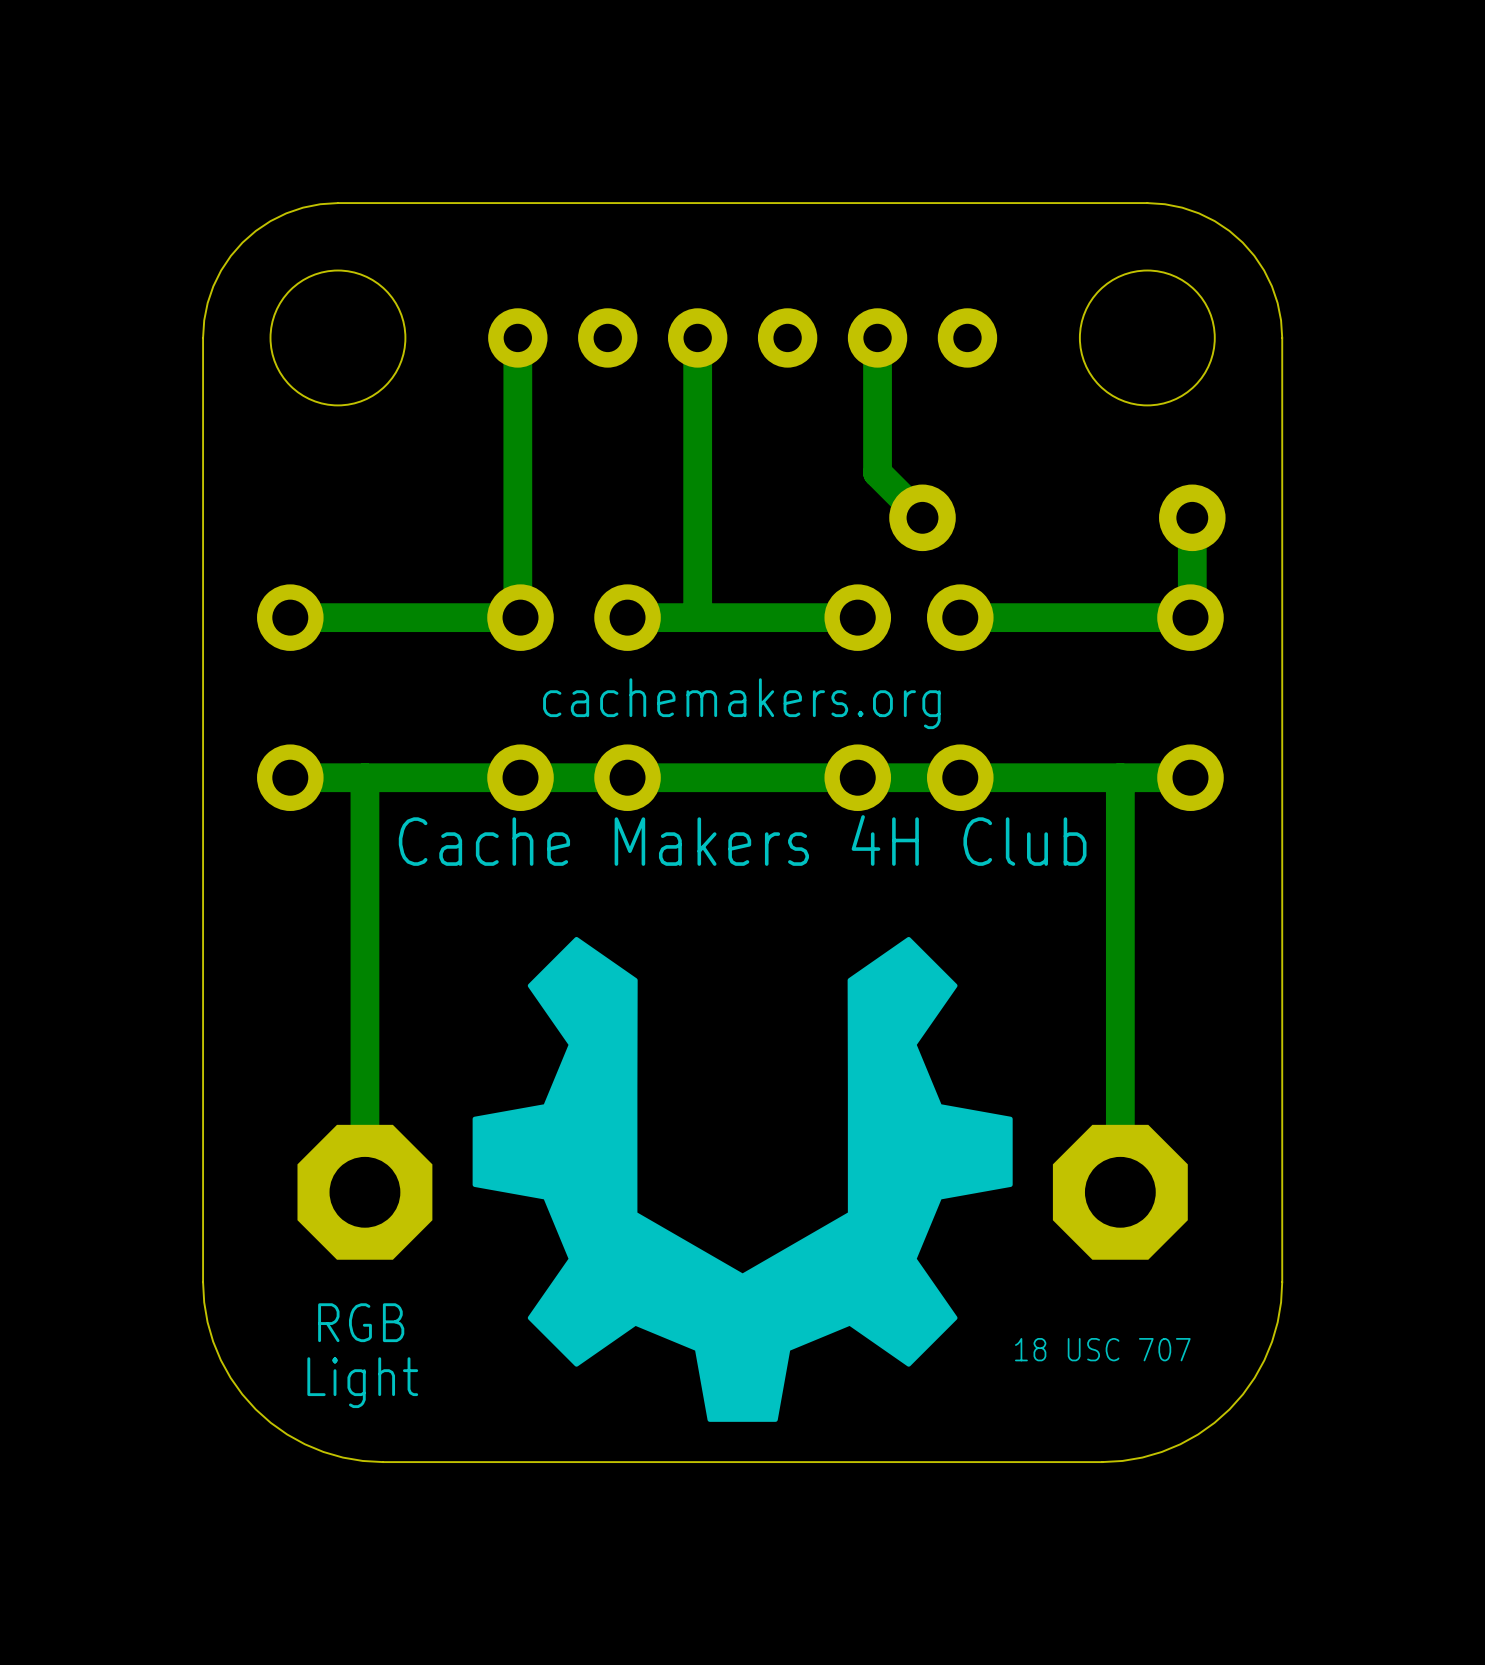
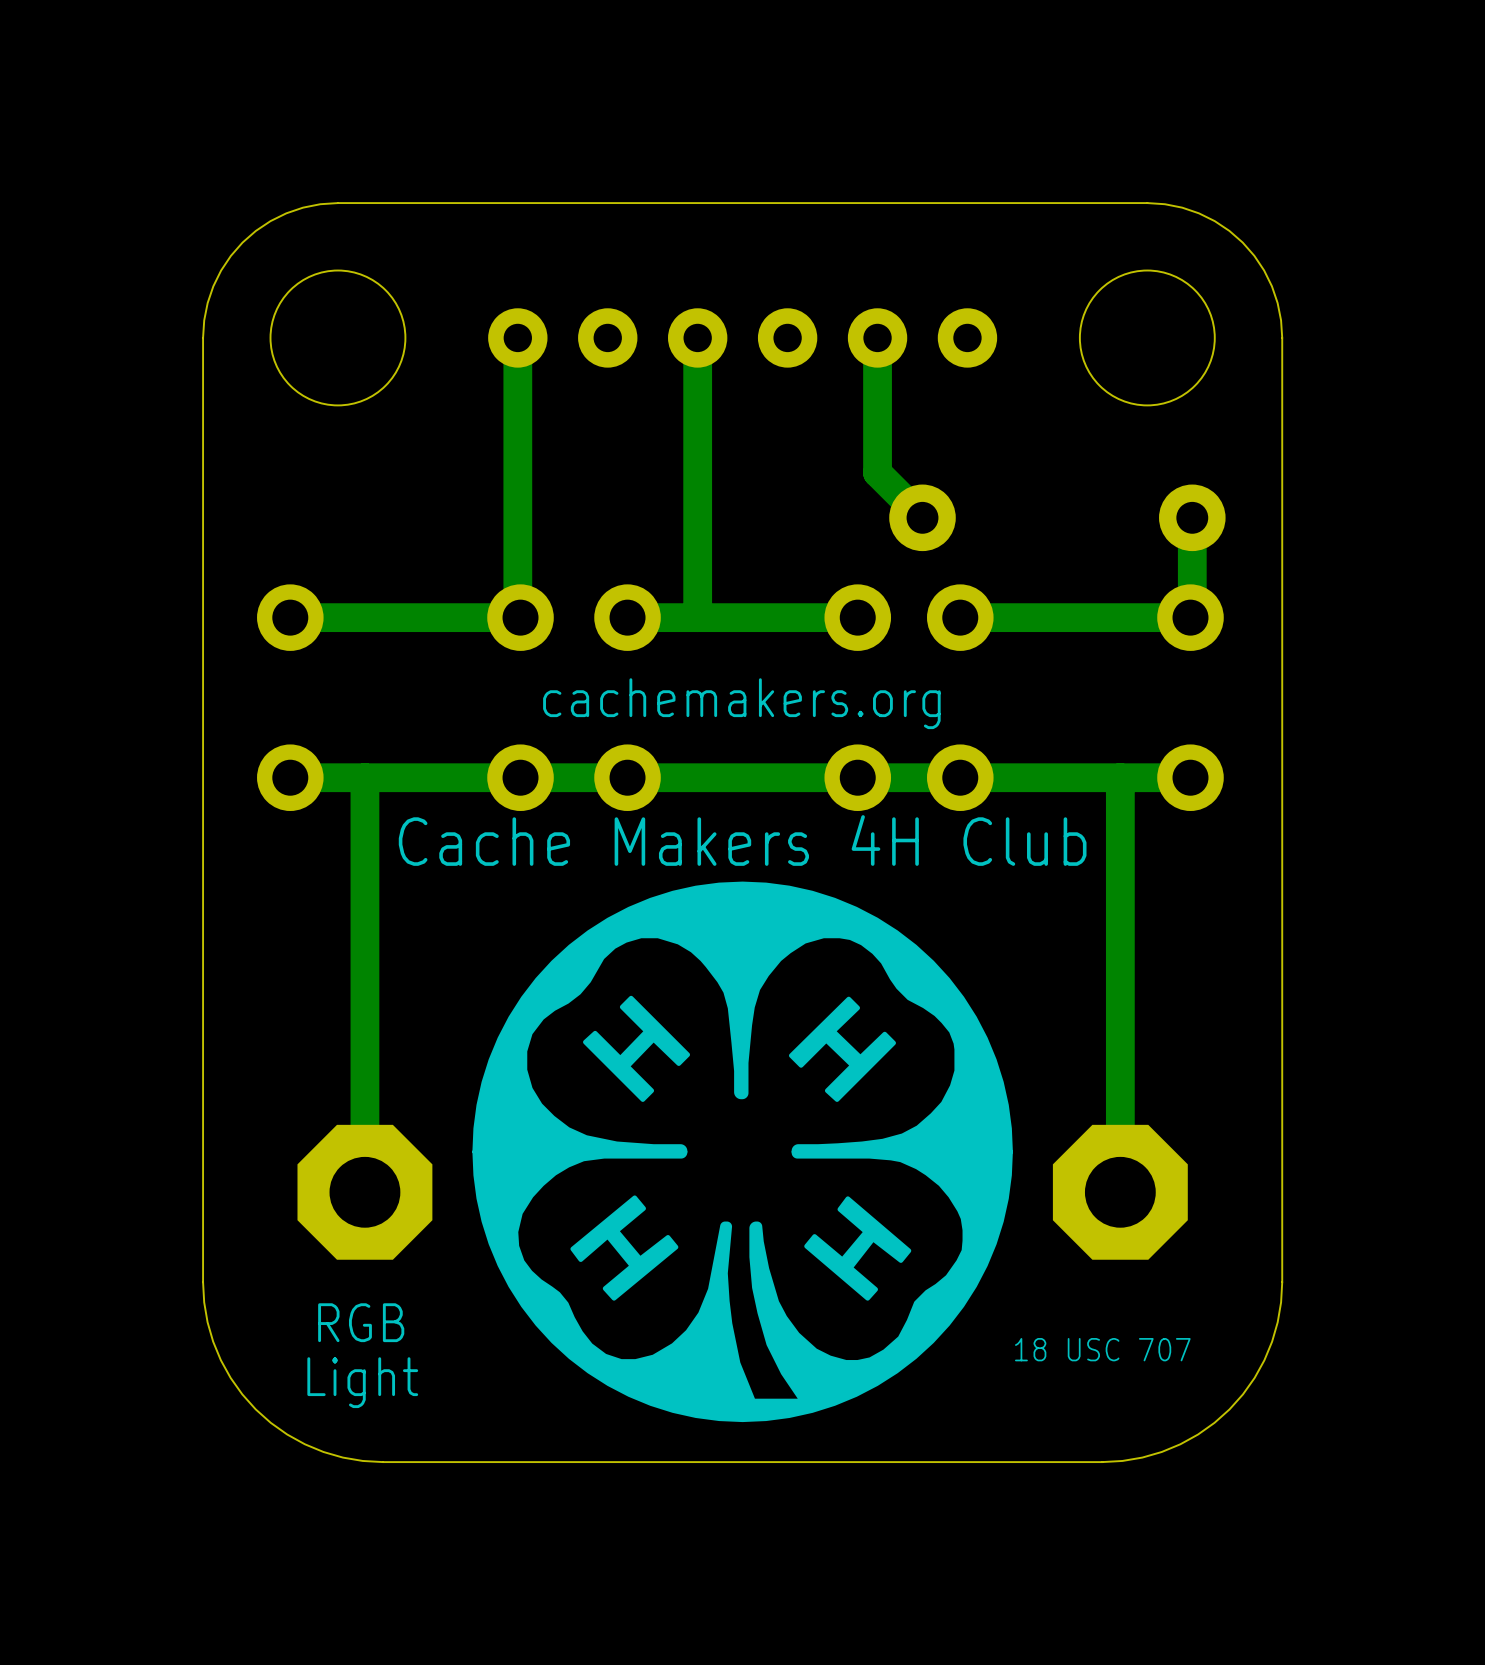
drawing shape: [472, 936, 1013, 1422] -> [472, 881, 1013, 1423]

